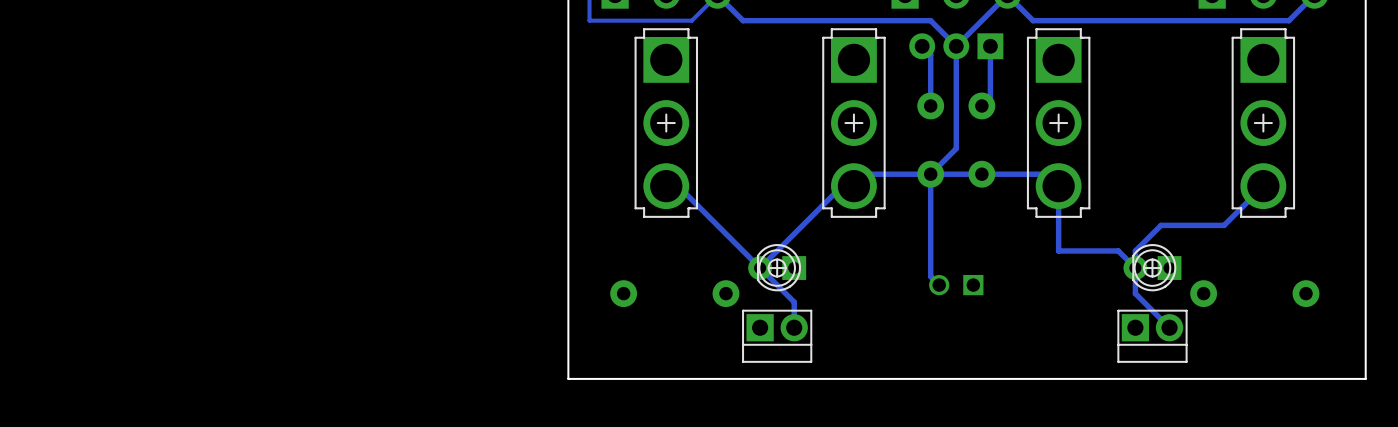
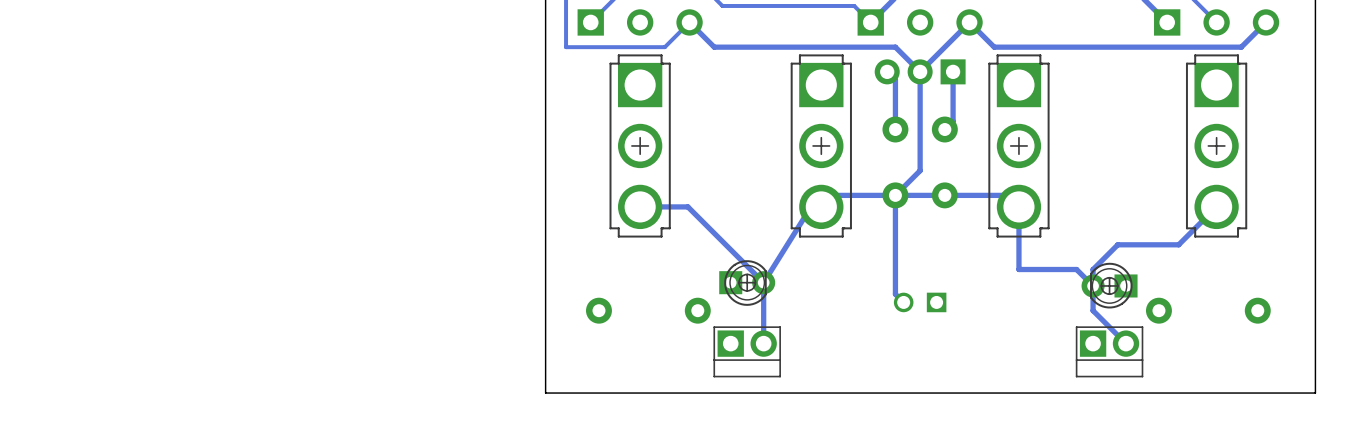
track: (678, 186) (794, 302) -> (651, 206) (687, 206) (763, 282)
track: (843, 186) (760, 268) -> (811, 206) (763, 282)
track: none -> (763, 282) (763, 318)
part rotation: 0° (777, 267) -> 180° (747, 283)

